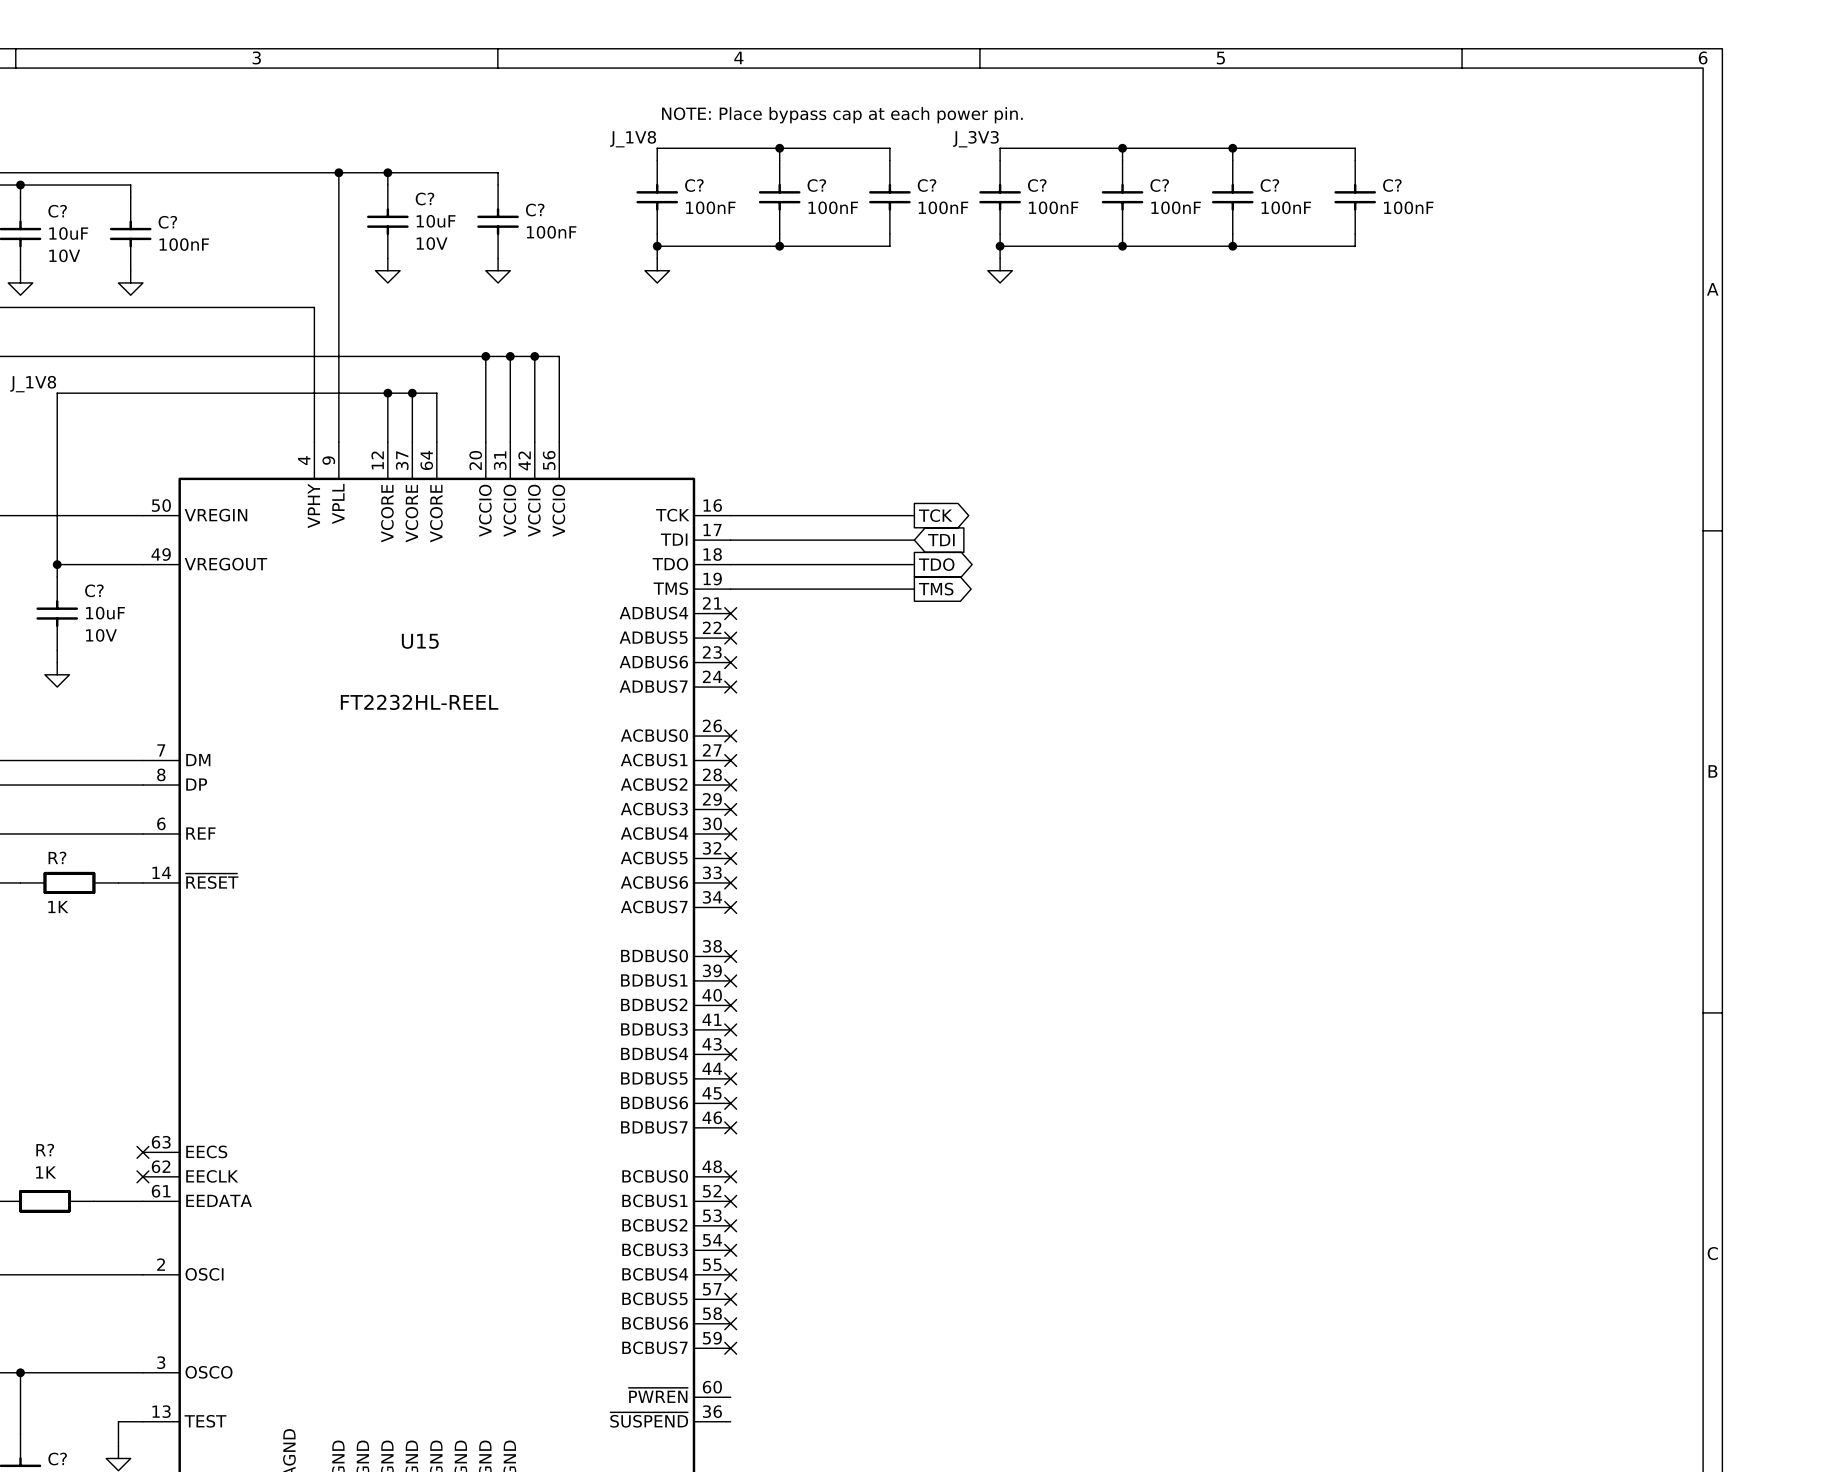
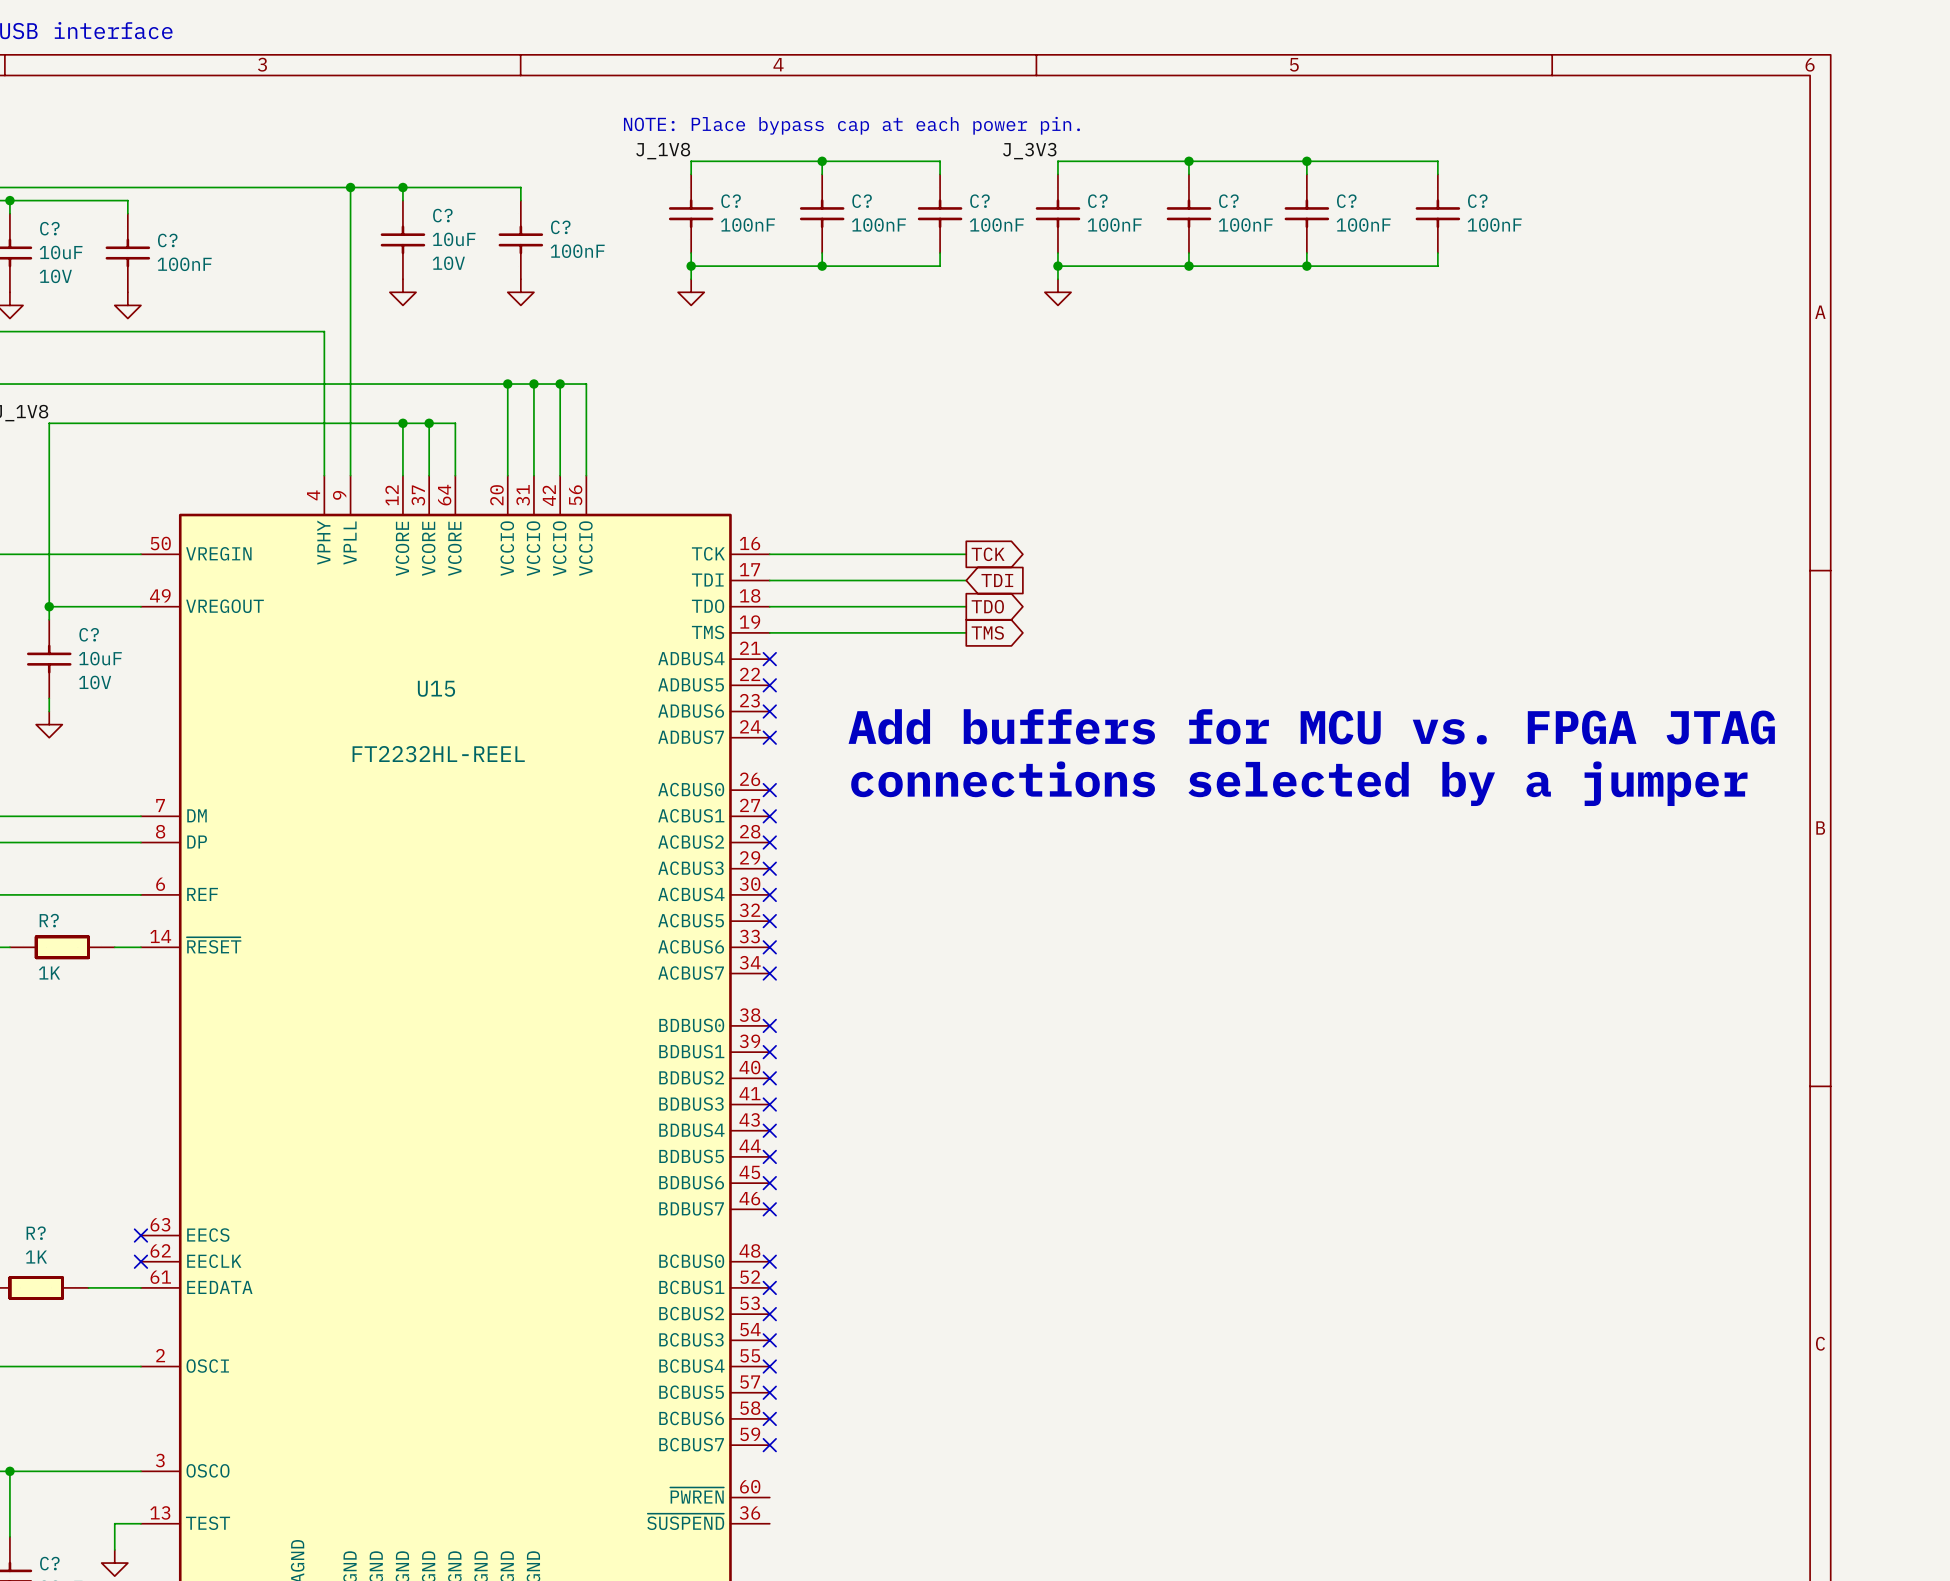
text: none -> Add buffers for MCU vs. FPGA JTAG (1311, 726)
text: none -> connections selected by a jumper (1299, 783)

